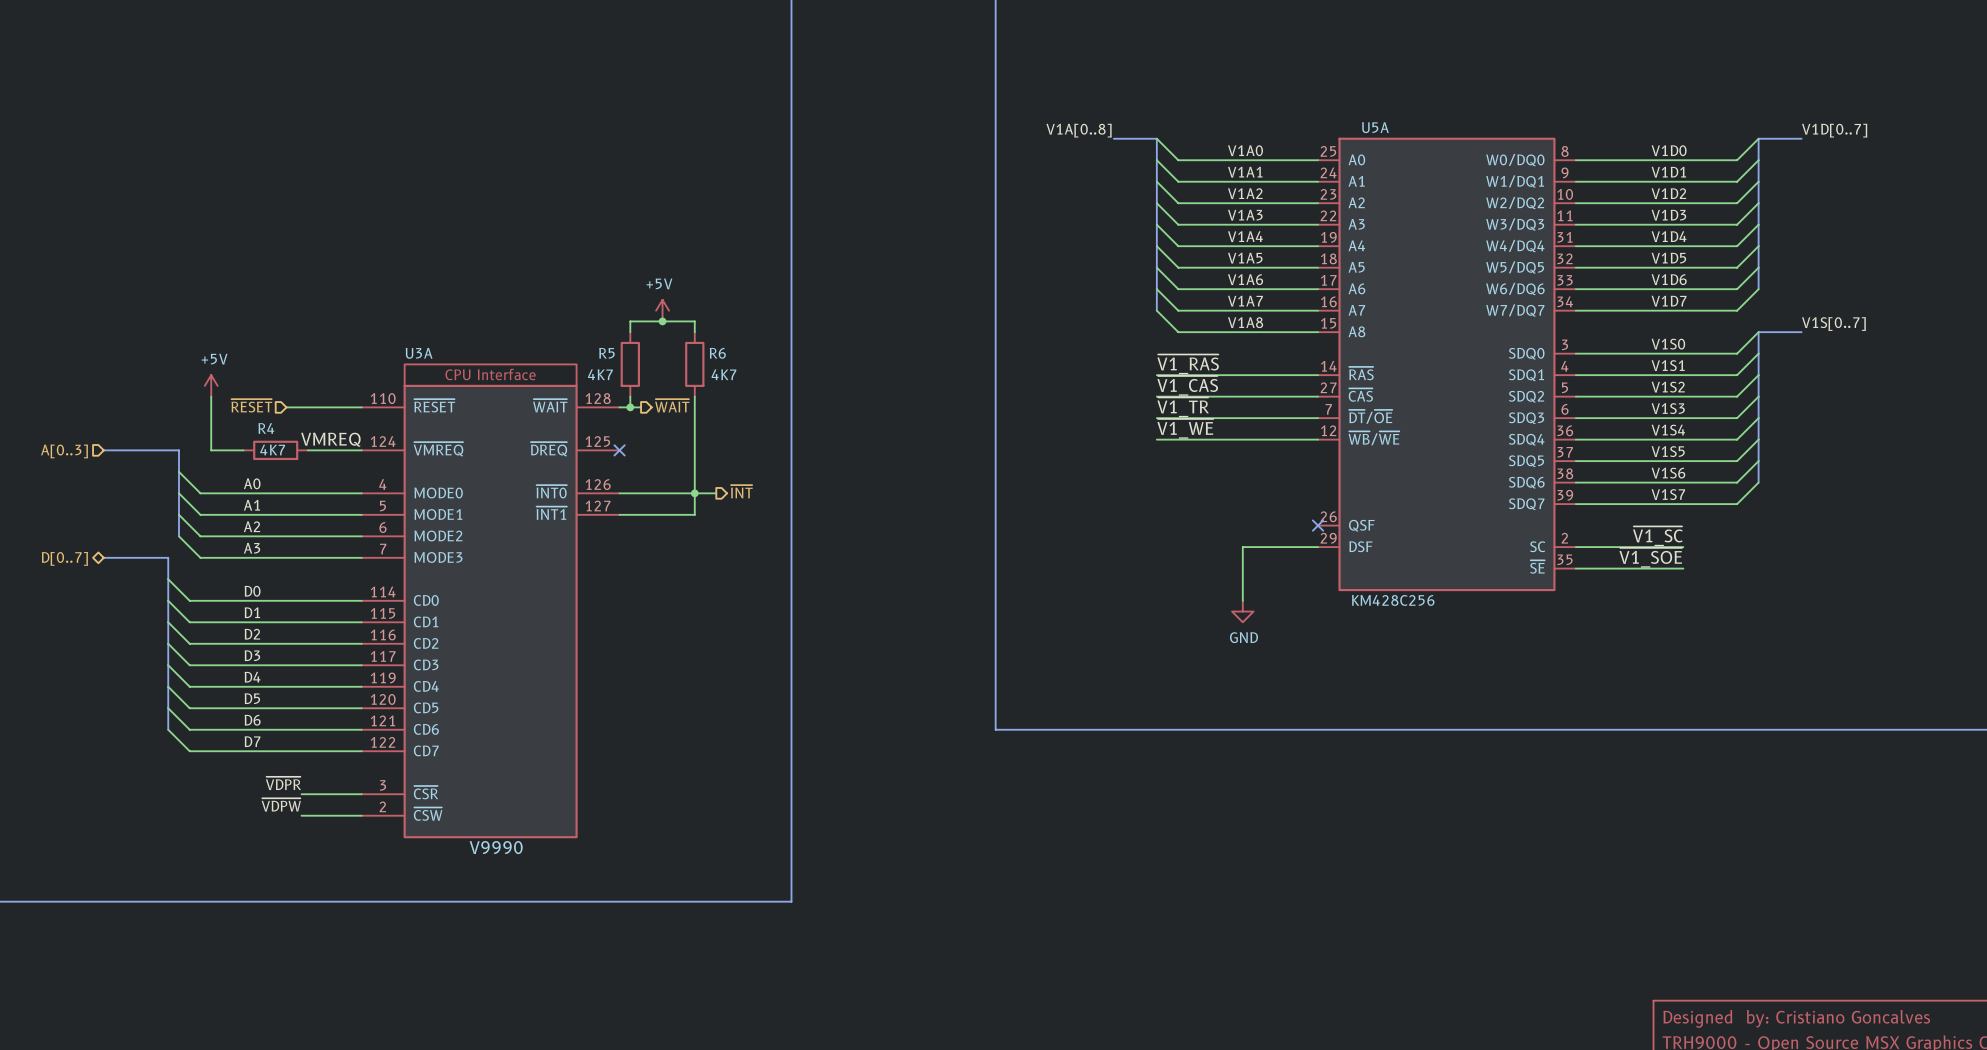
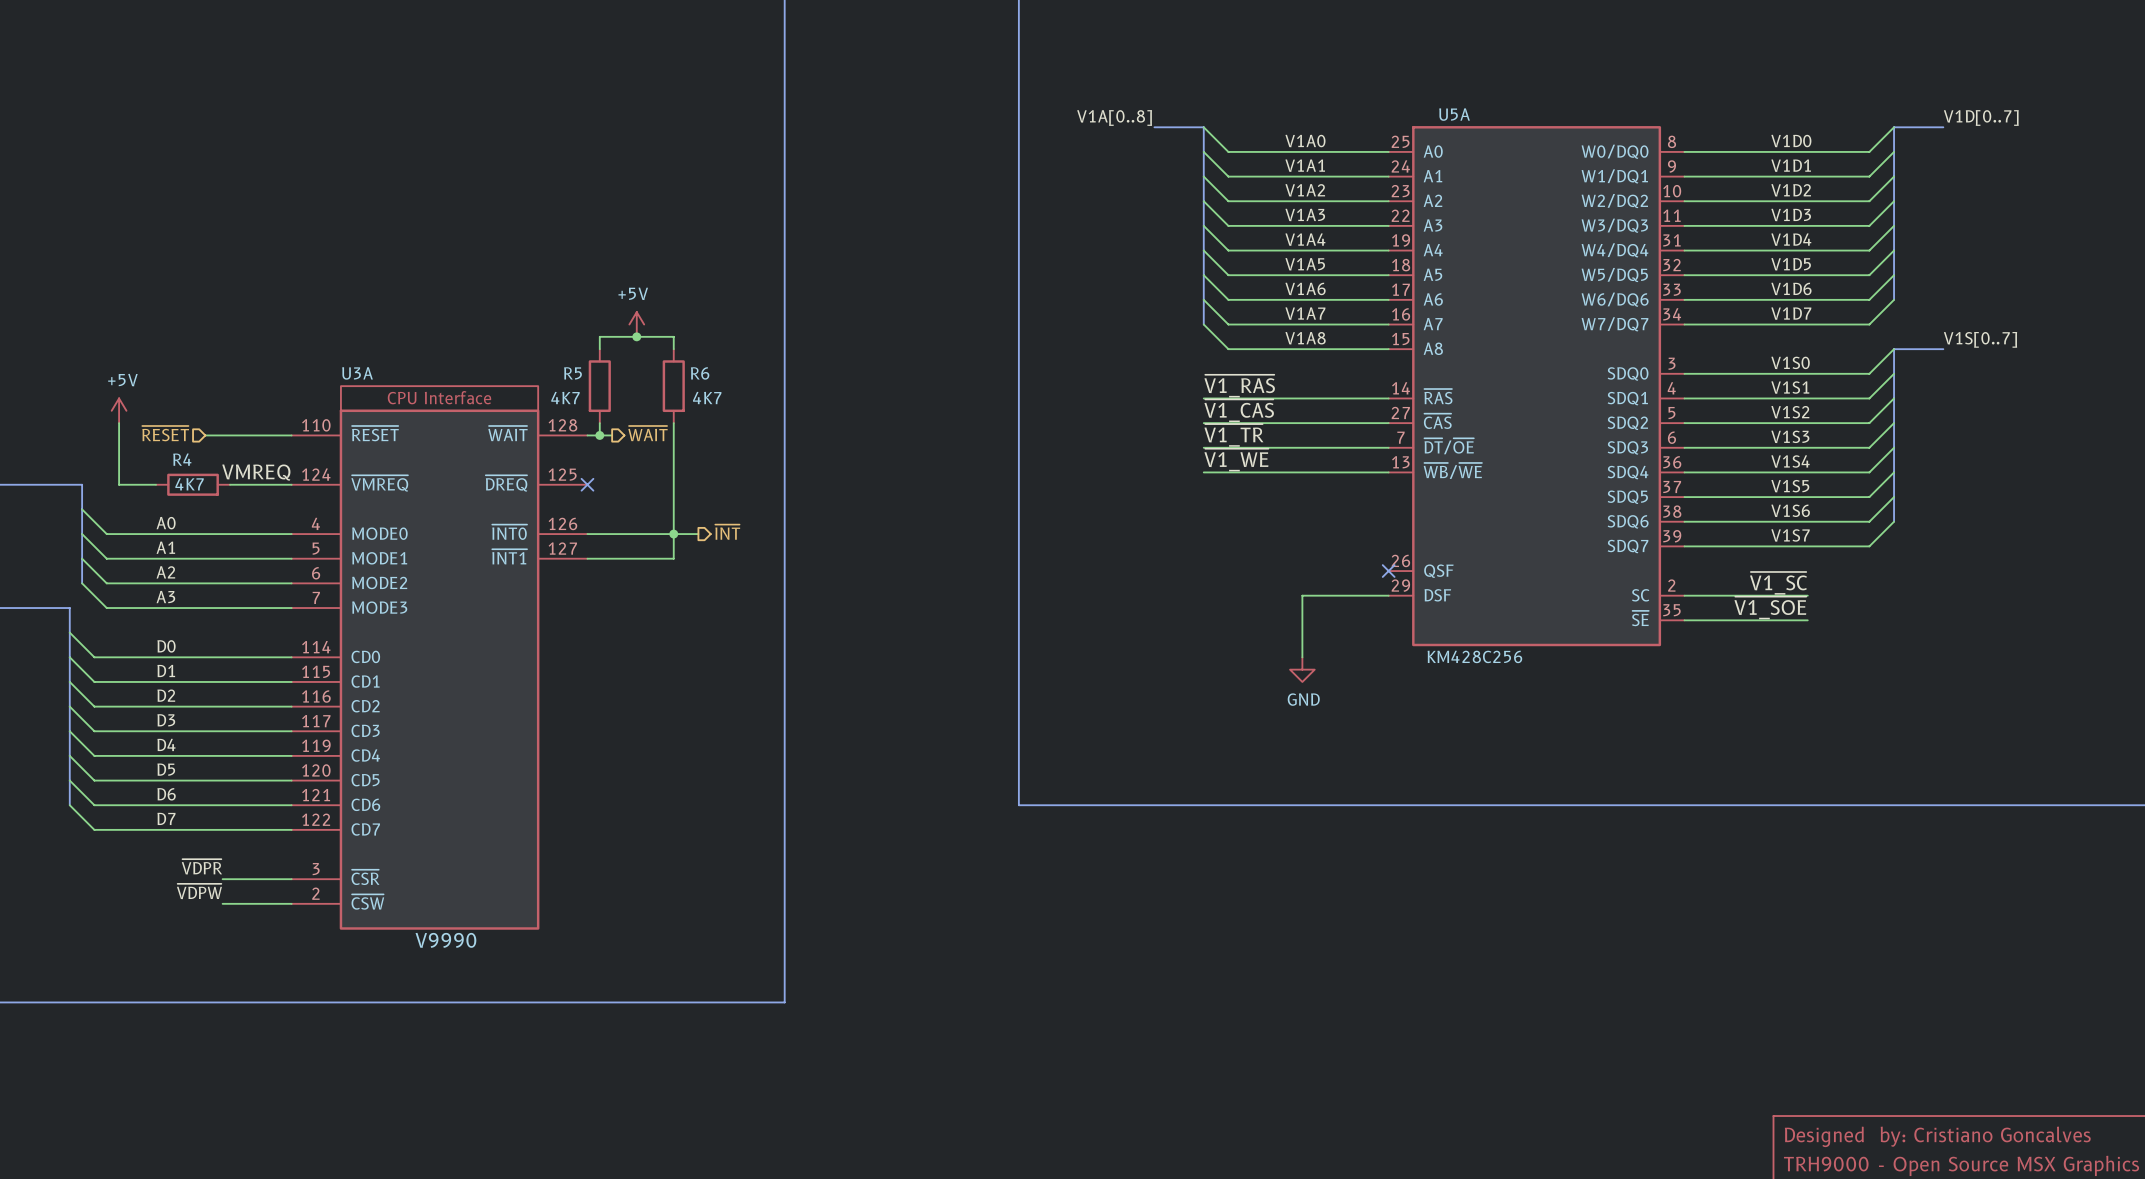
U5A pin number: 12 (1328, 430) -> 13 (1400, 462)

